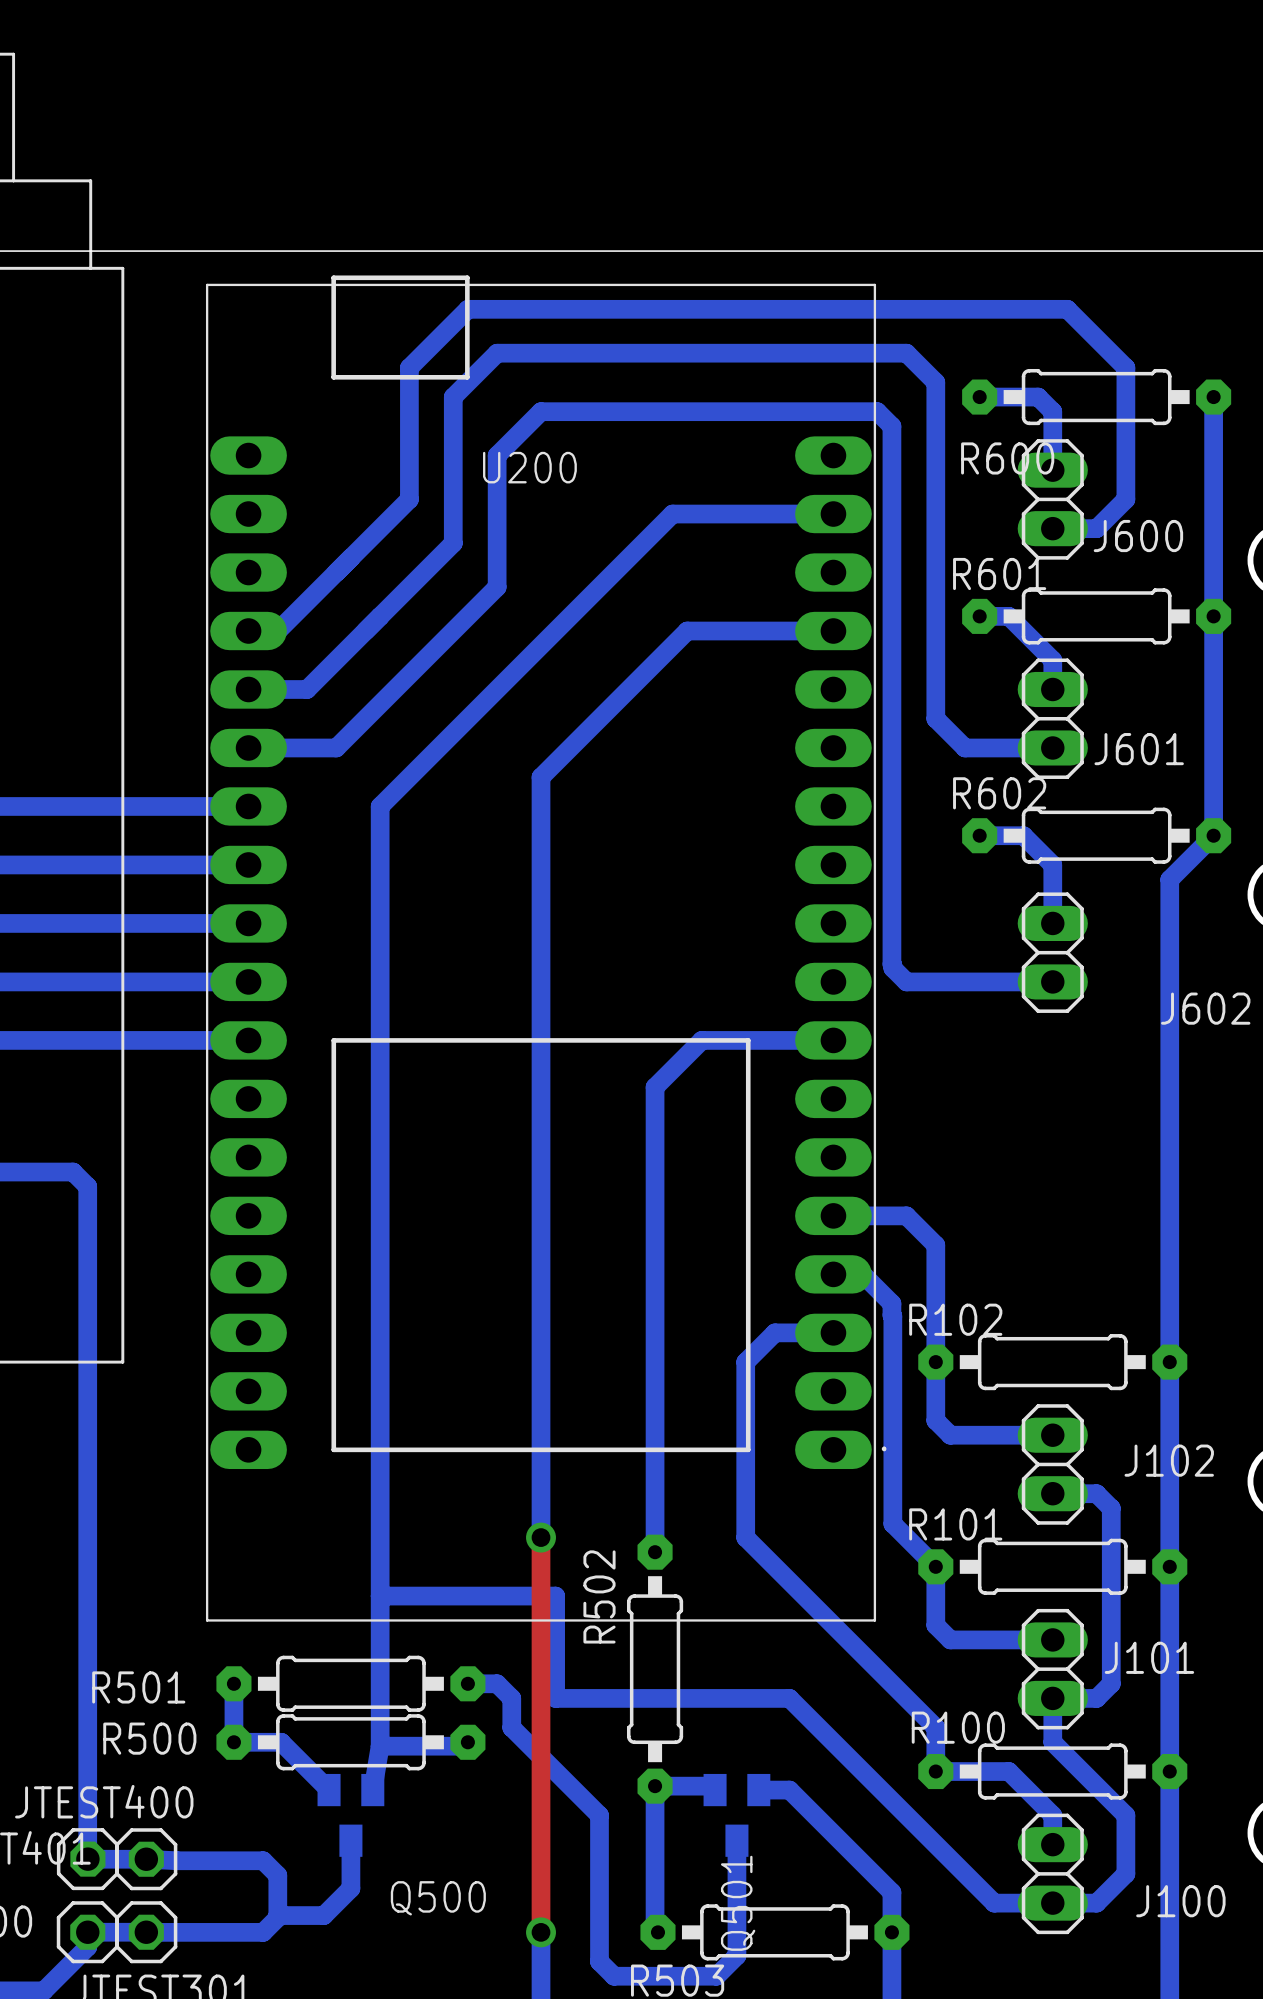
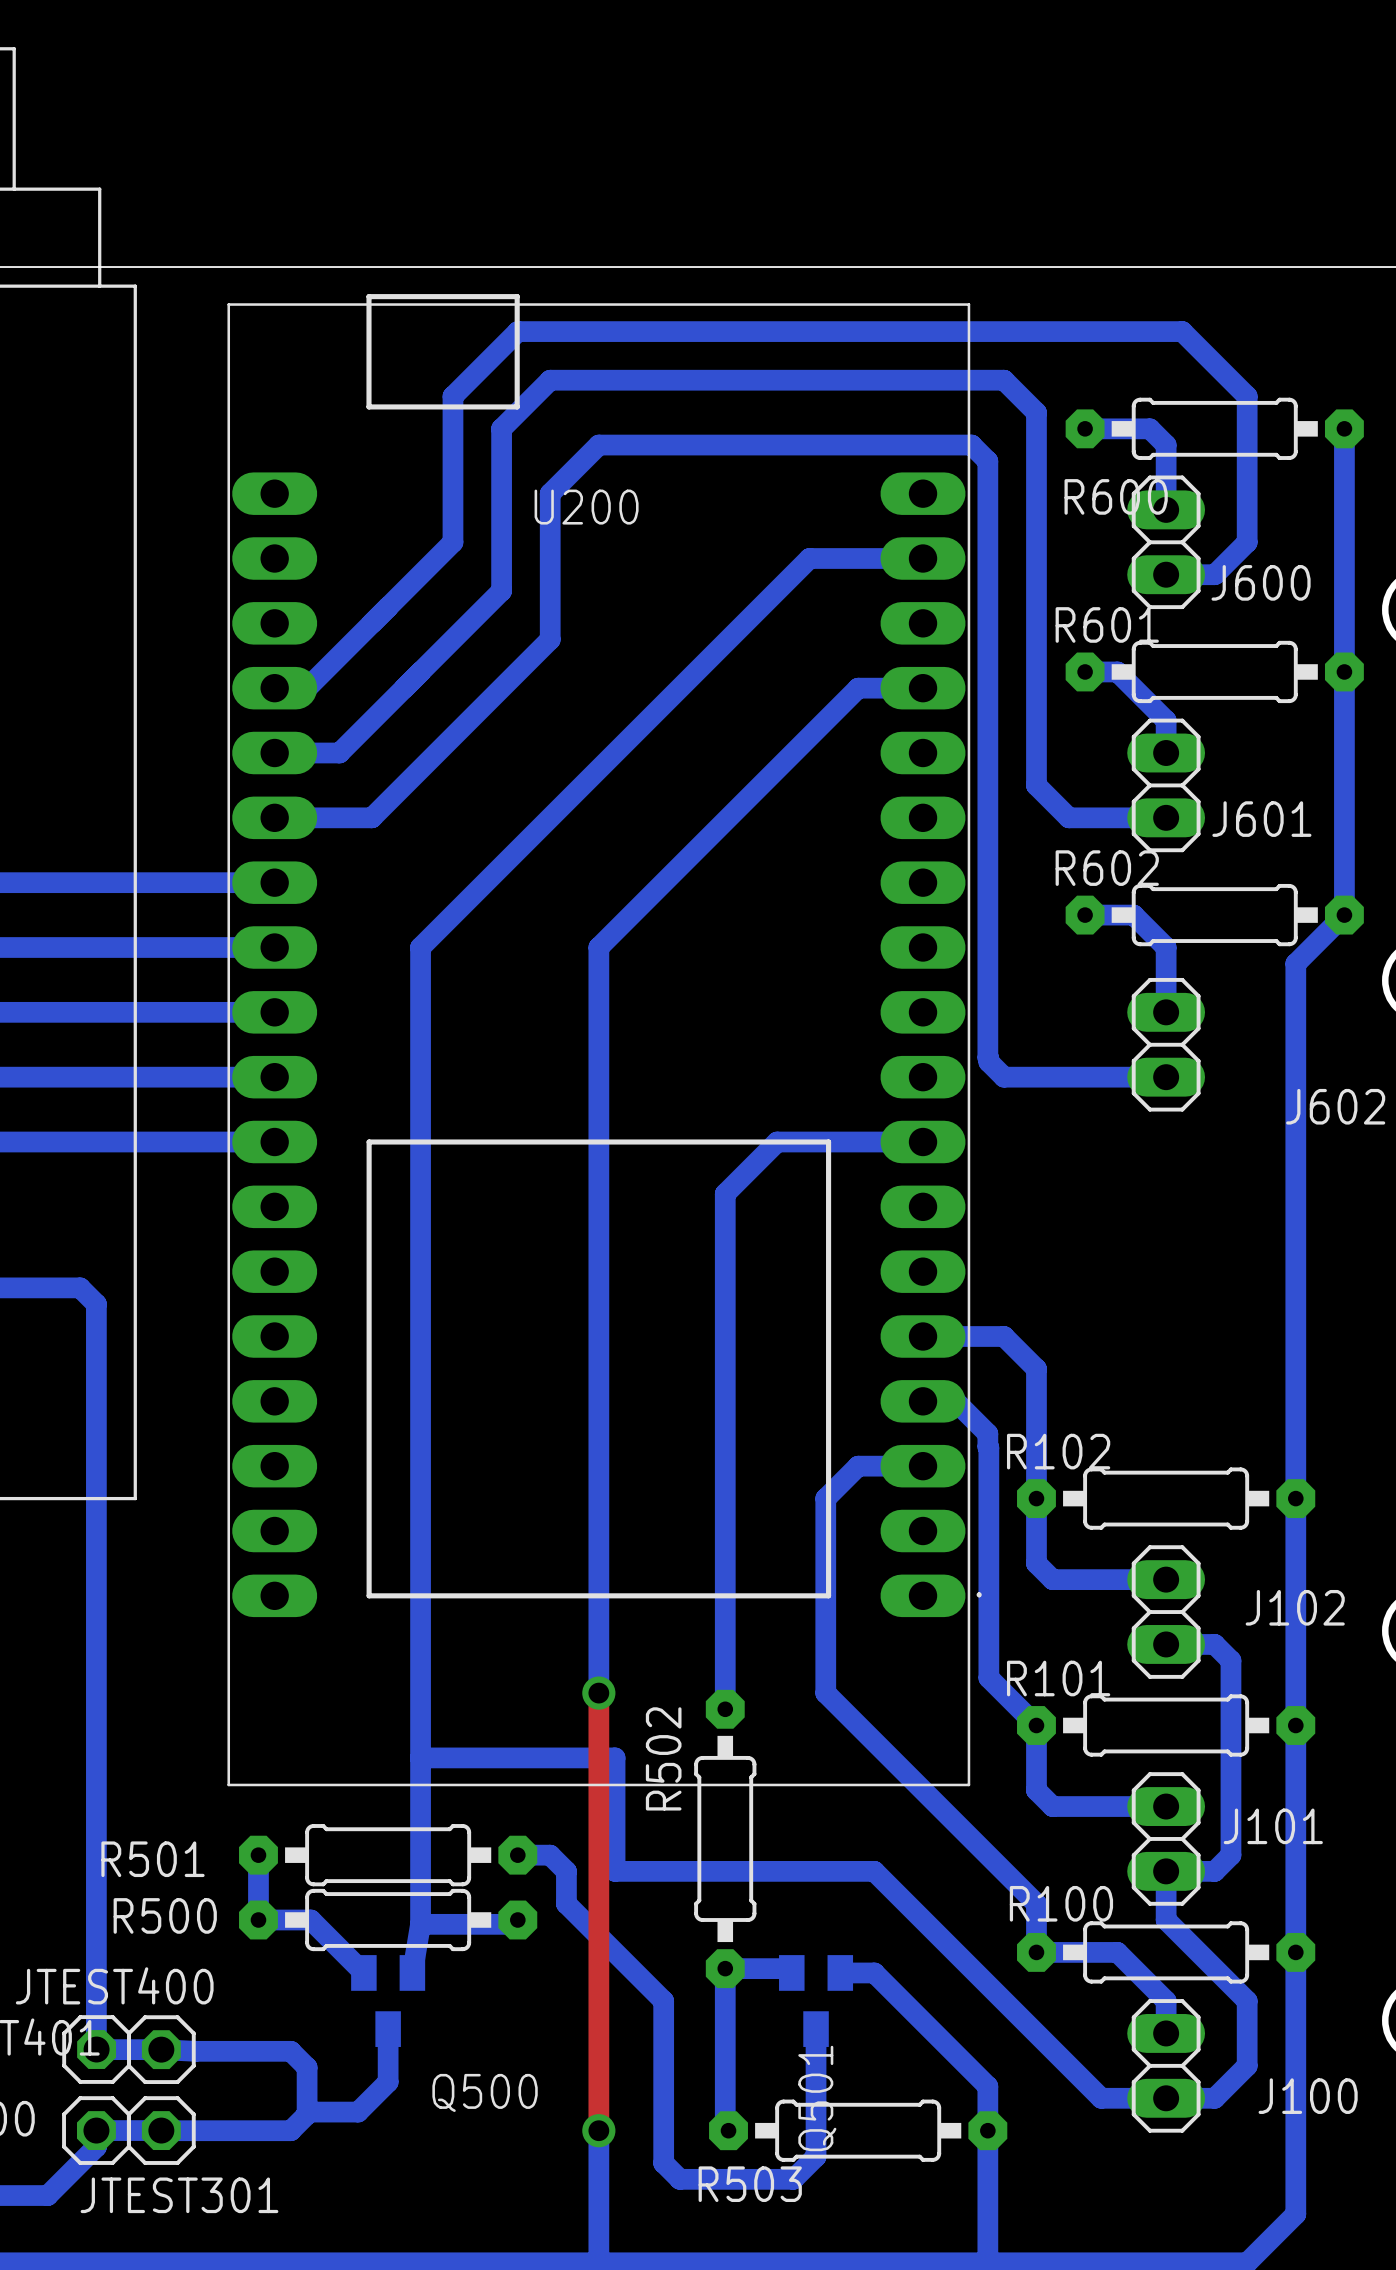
bottom track: (731, 514) (672, 514) (380, 806) (380, 864) -> (809, 558) (420, 947)
bottom track: (774, 631) (687, 631) (541, 777) (541, 864) -> (858, 688) (598, 947)

